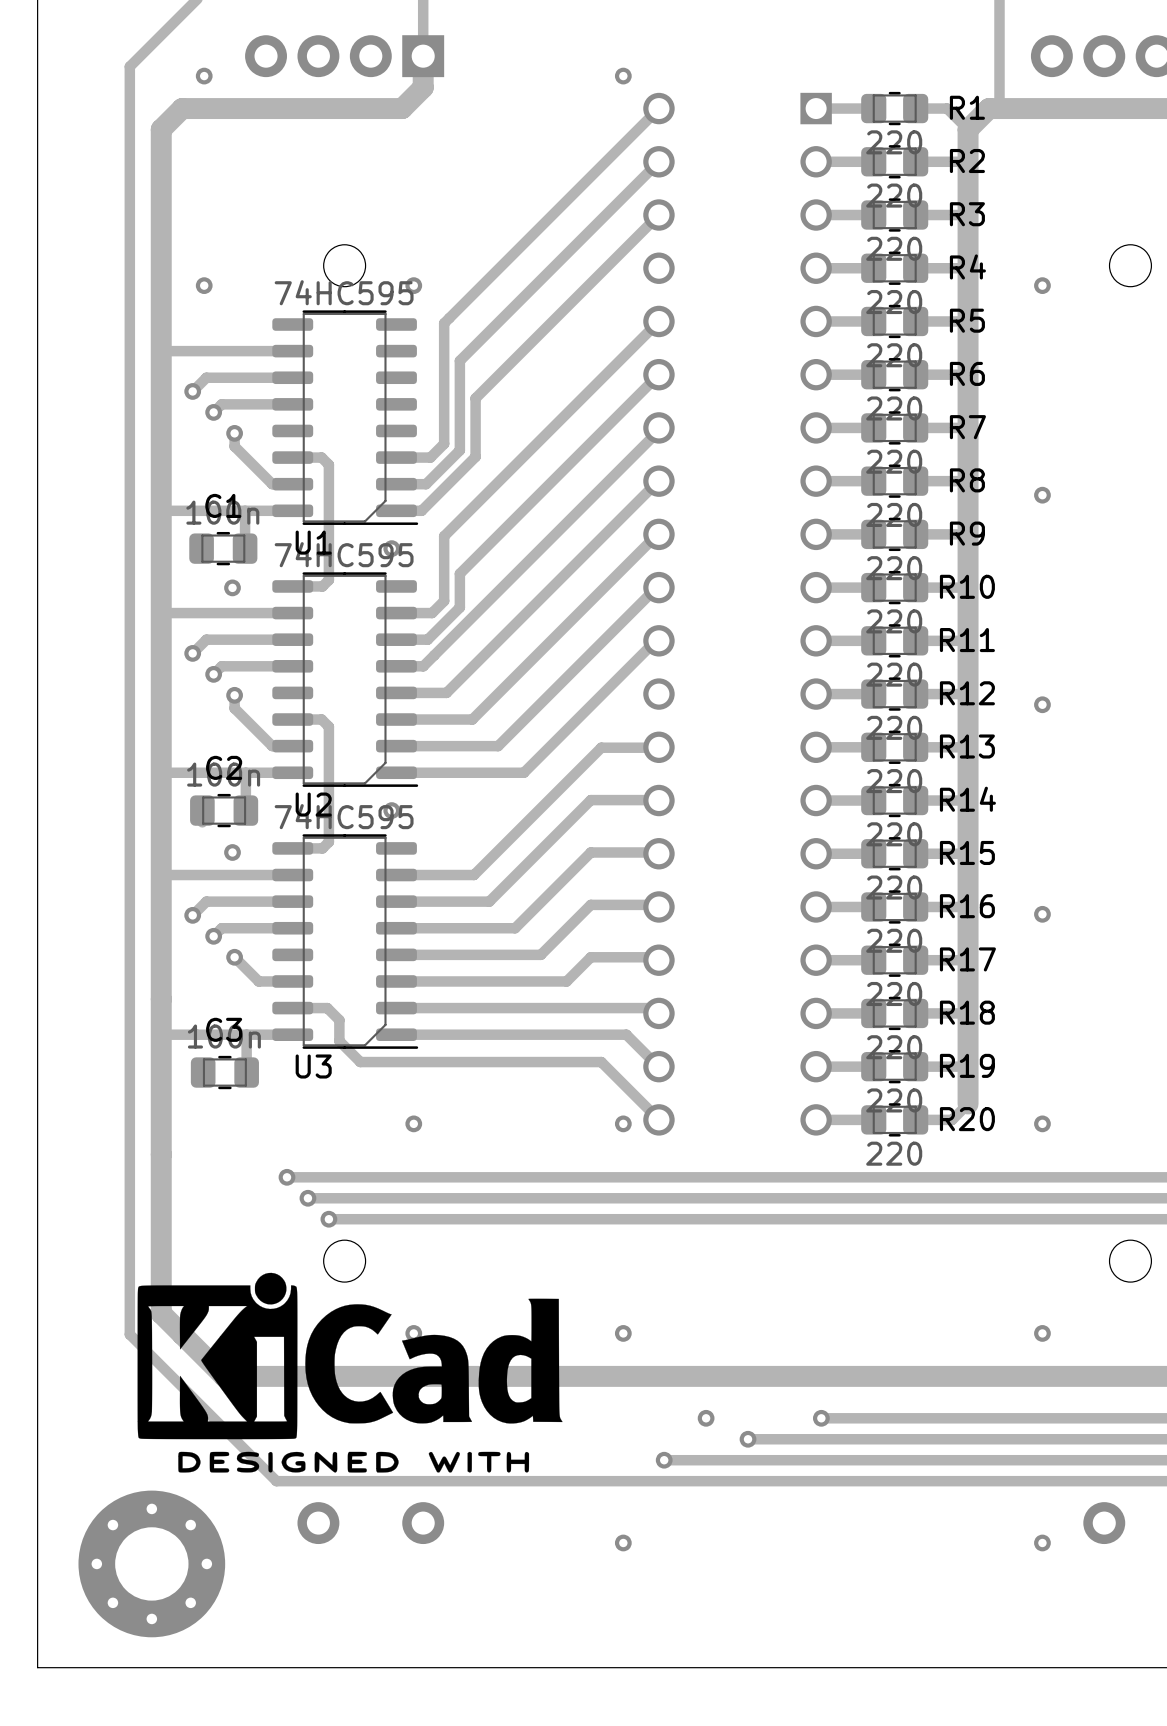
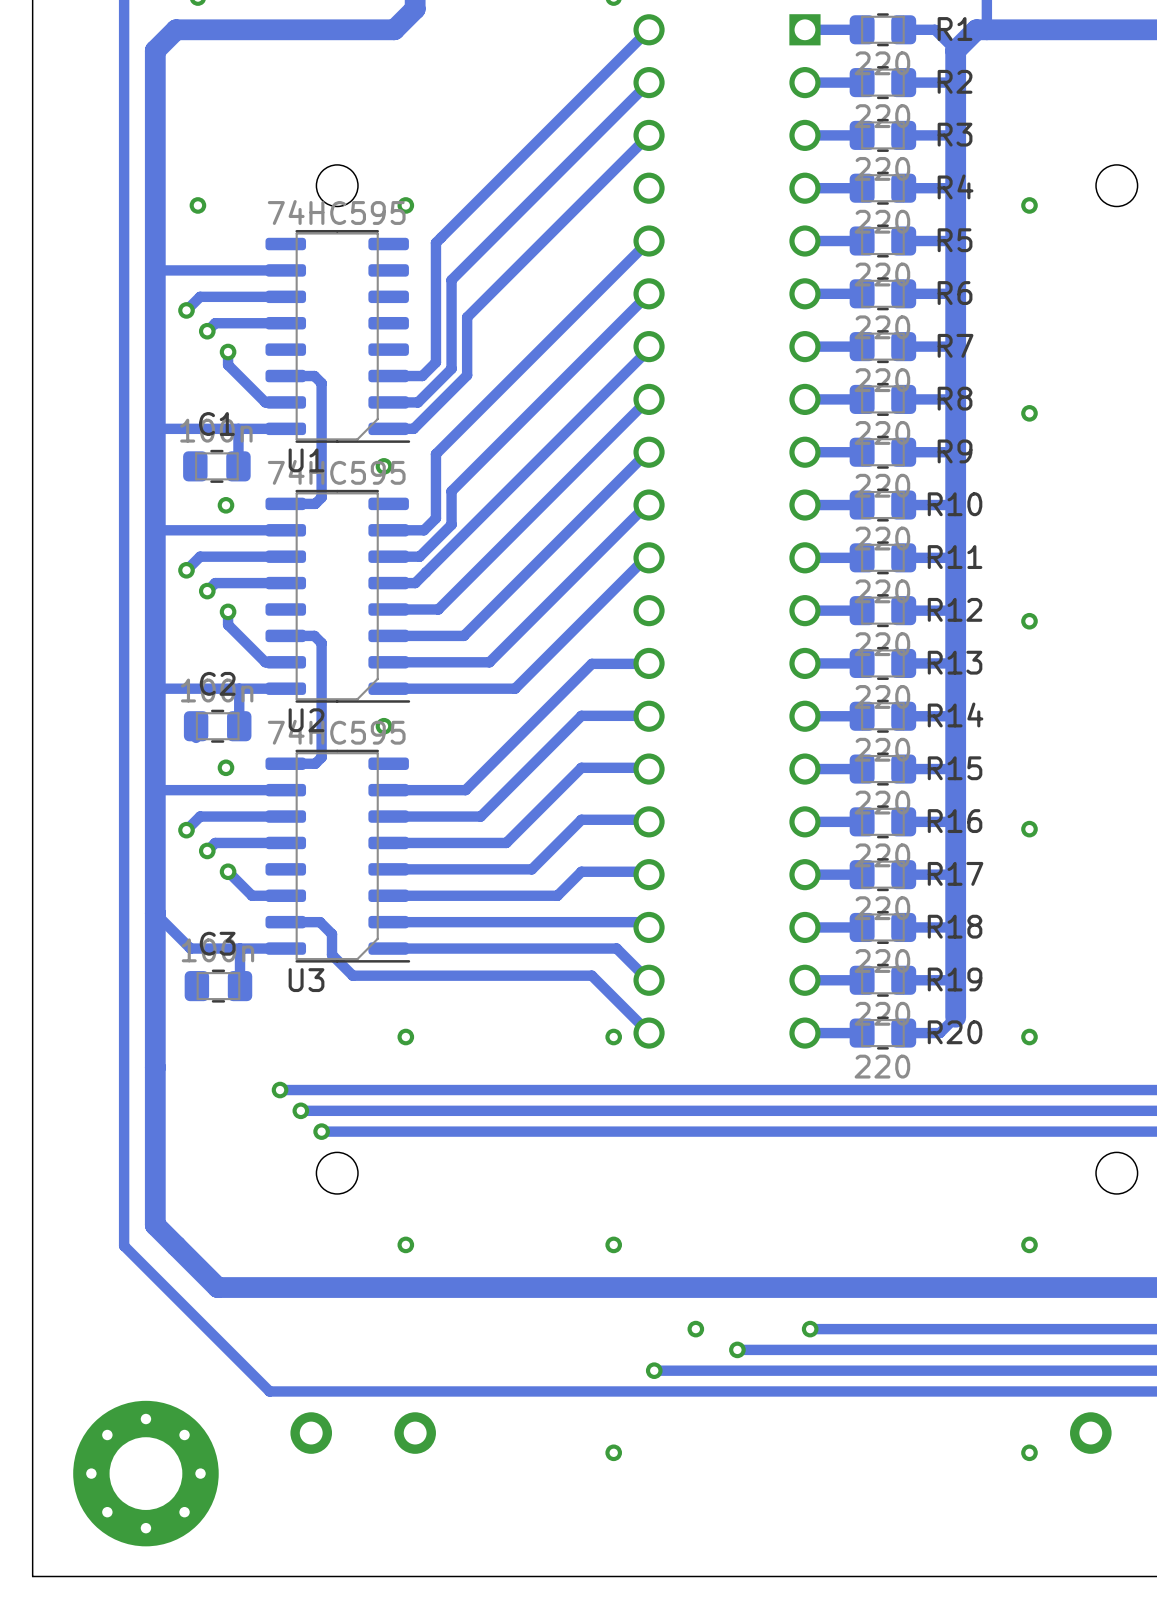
track: (196, 1034) (161, 1034) -> (190, 948) (155, 913)
drawing: [137, 1272, 563, 1473] -> none

